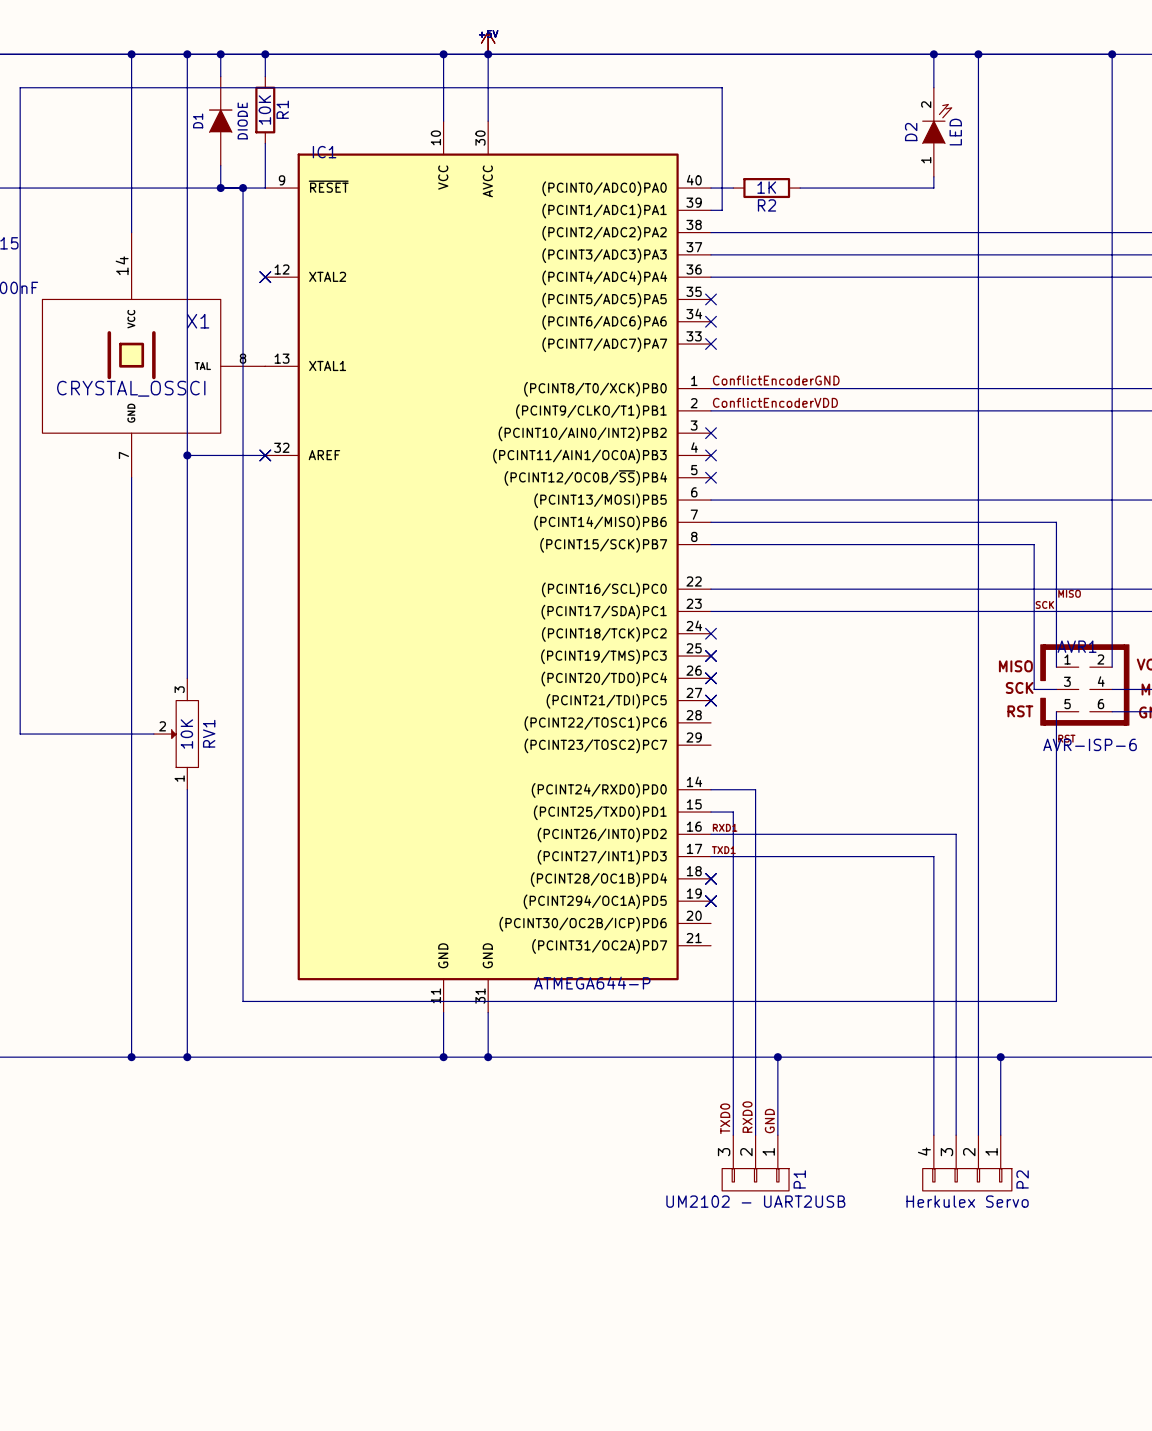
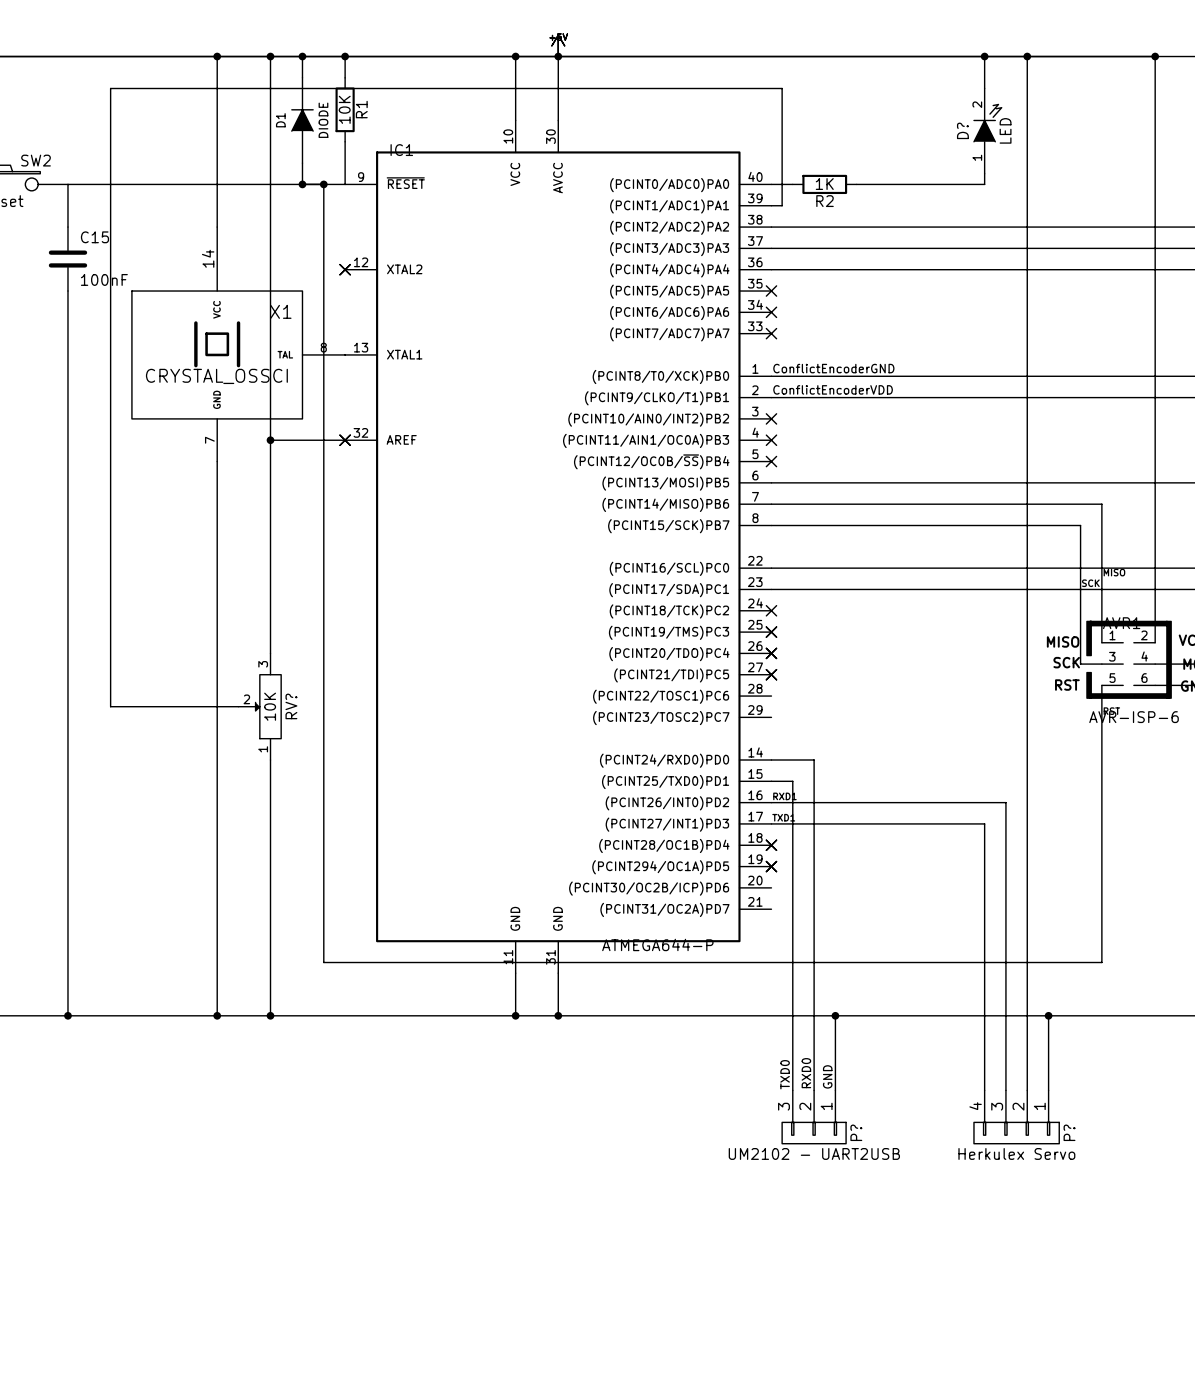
D2 name: D2 (911, 132) -> D? (962, 130)
RV1 name: RV1 (209, 733) -> RV? (291, 706)
P1 name: P1 (799, 1179) -> P? (856, 1132)
P2 name: P2 (1022, 1179) -> P? (1069, 1132)

